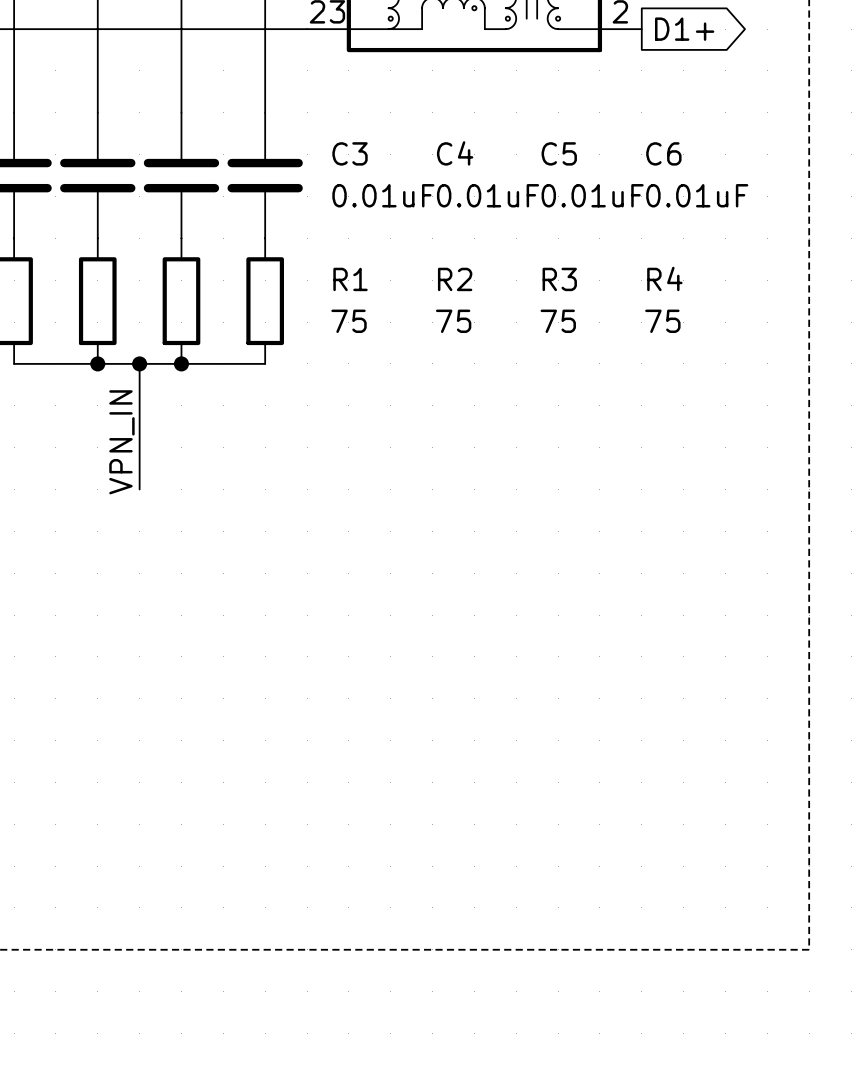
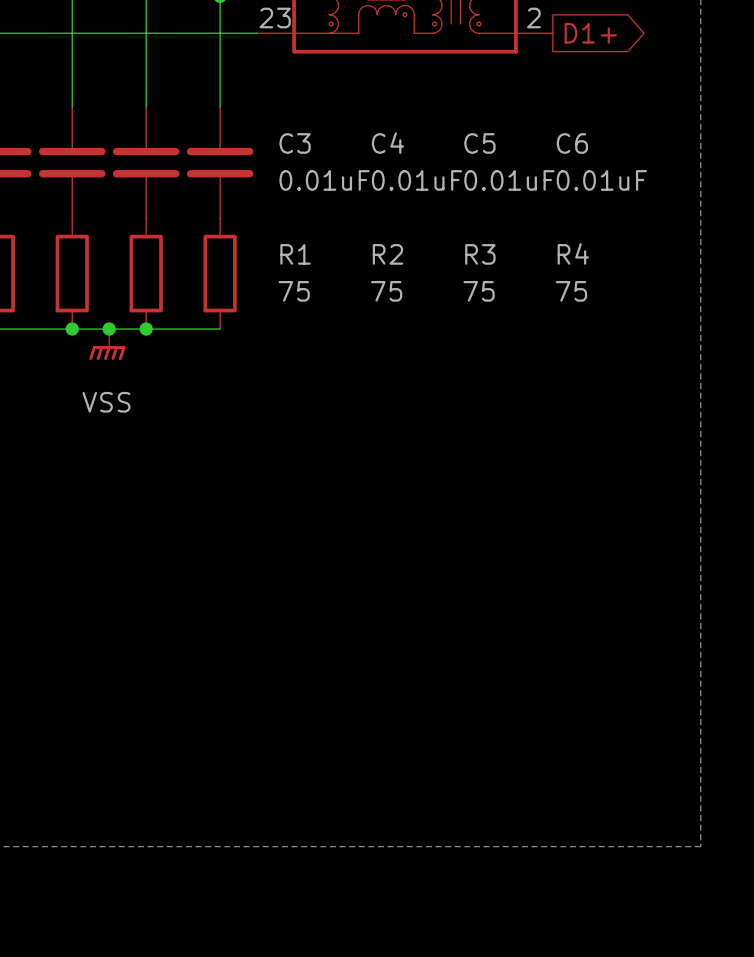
wire: (139, 363) (139, 489) -> none
power symbol: none -> VSS (107, 344)
label: VPN_IN (121, 442) -> none

